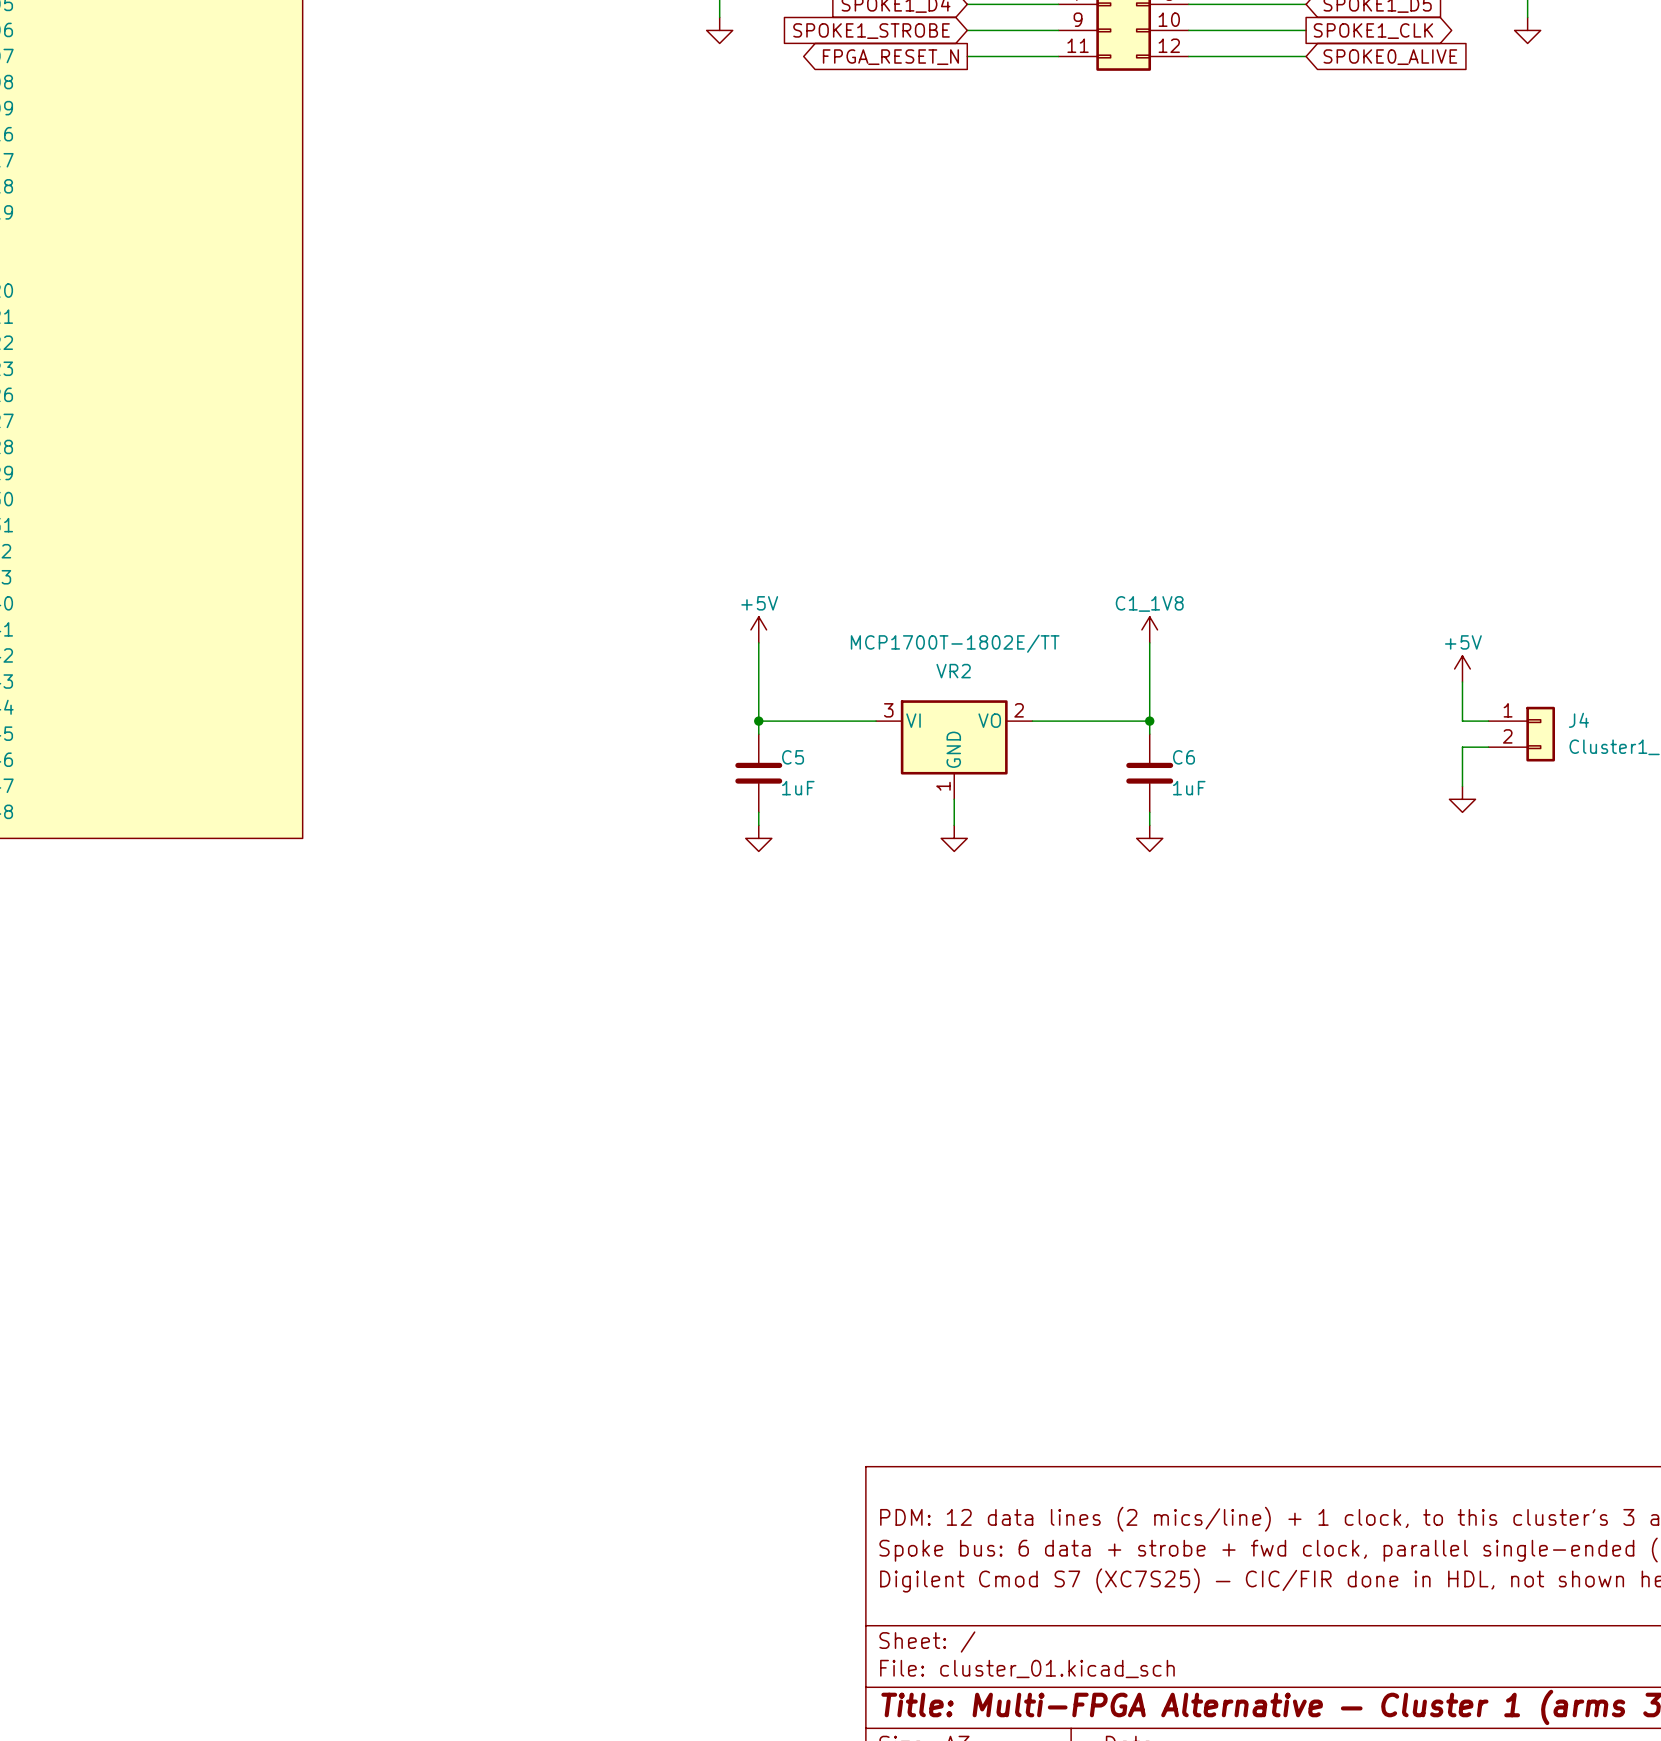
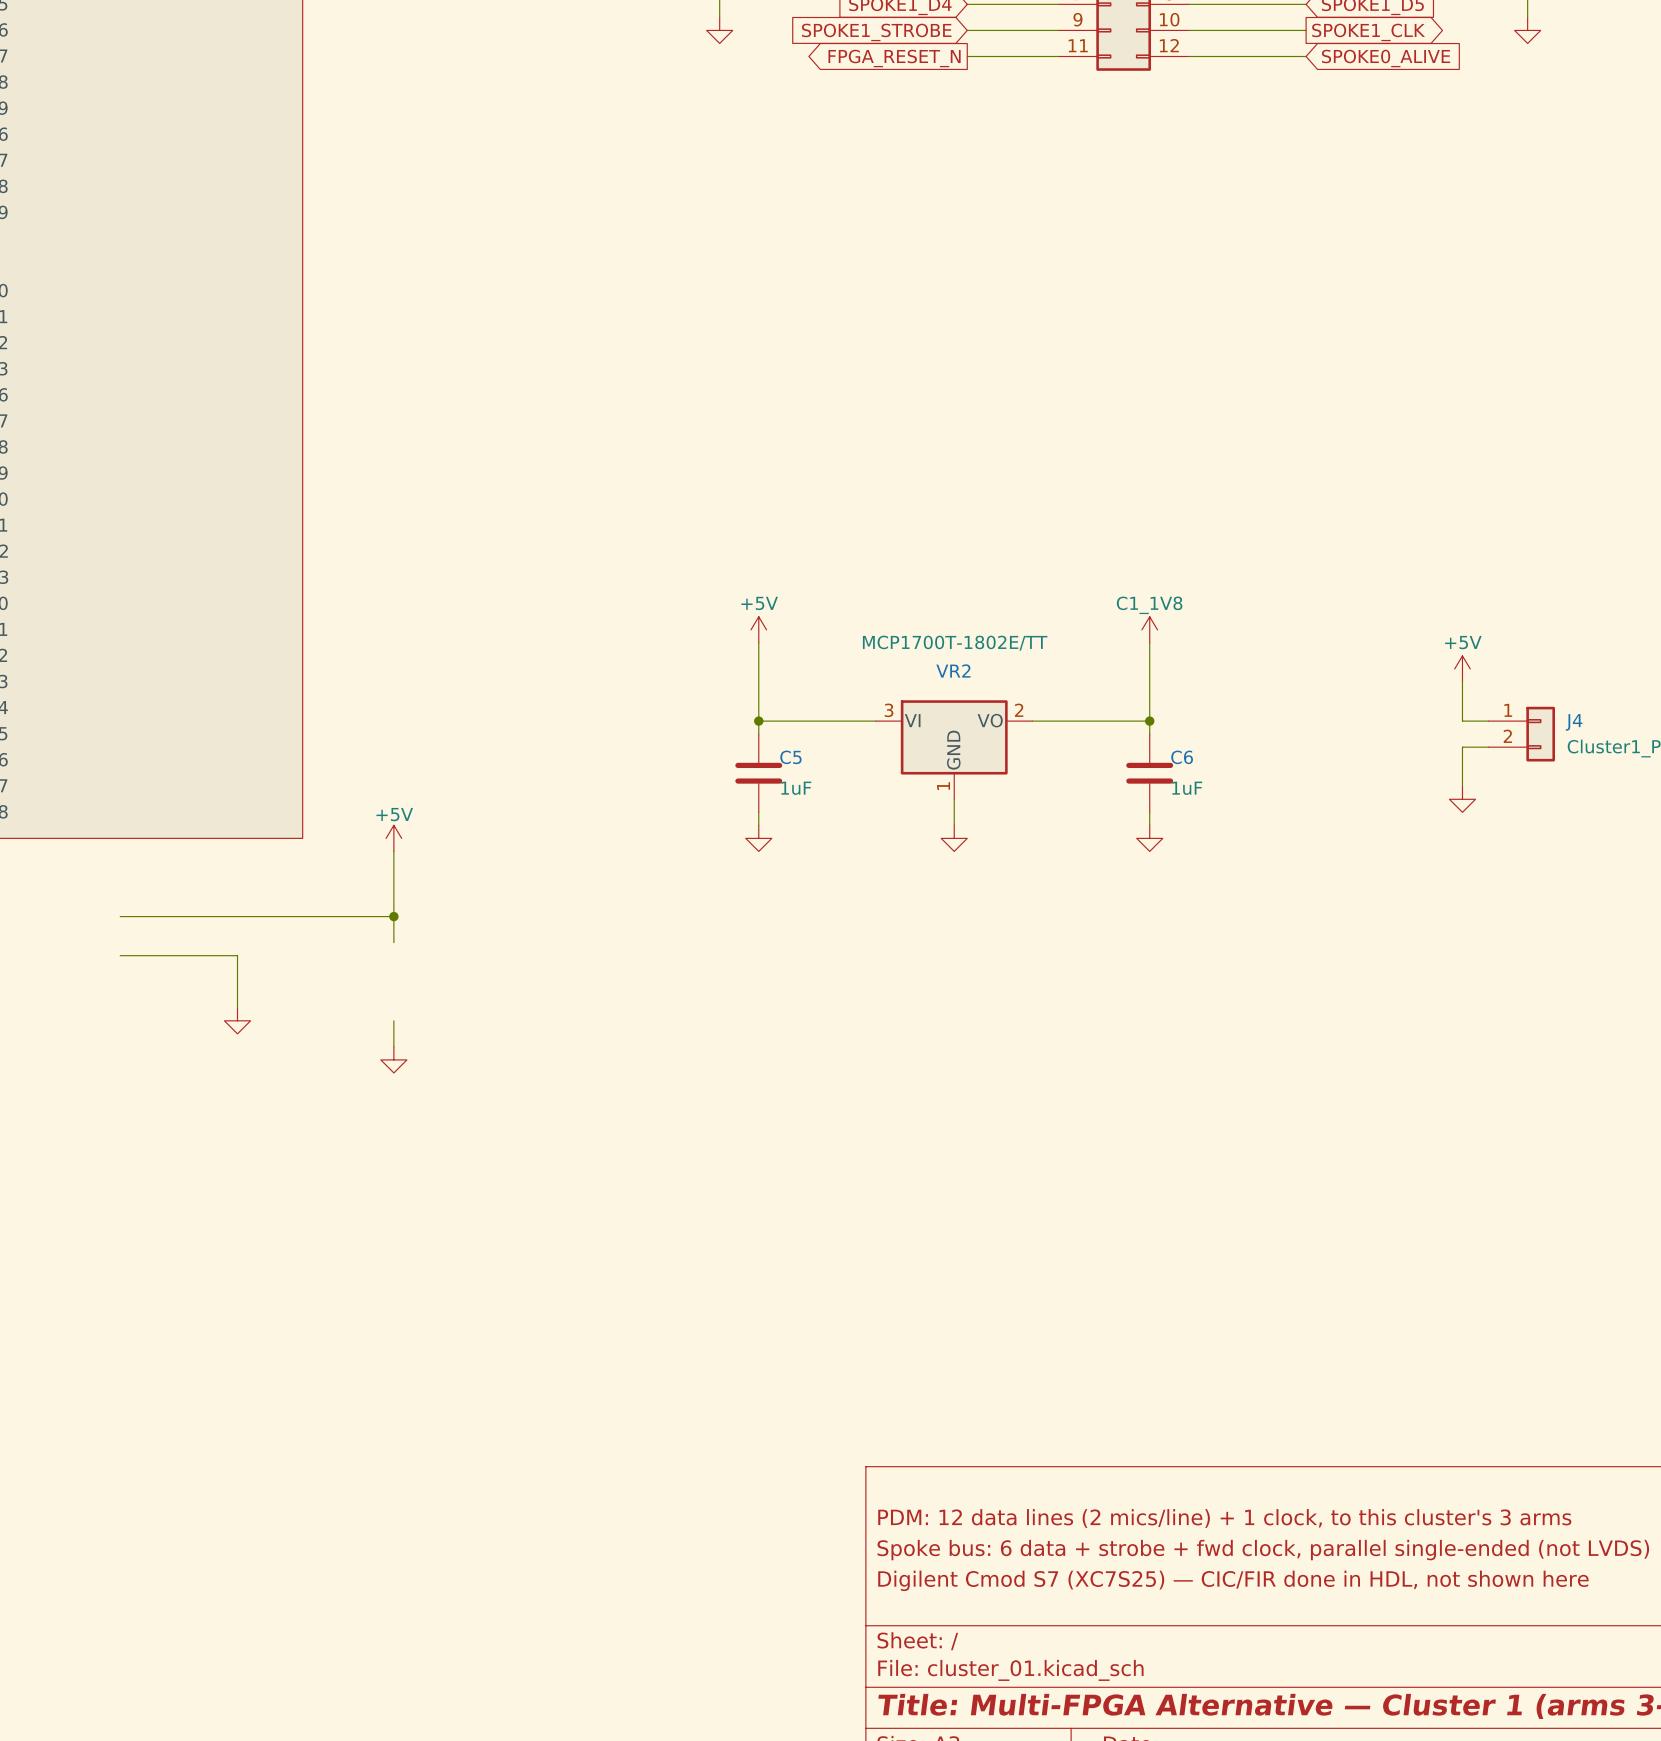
power symbol: none -> +5V (393, 838)
wire: none -> (393, 851) (393, 942)
wire: none -> (120, 916) (393, 916)
junction: none -> (393, 916)
wire: none -> (120, 955) (237, 955) (237, 1007)
power symbol: none -> (237, 1020)
wire: none -> (393, 1020) (393, 1046)
power symbol: none -> (393, 1059)

